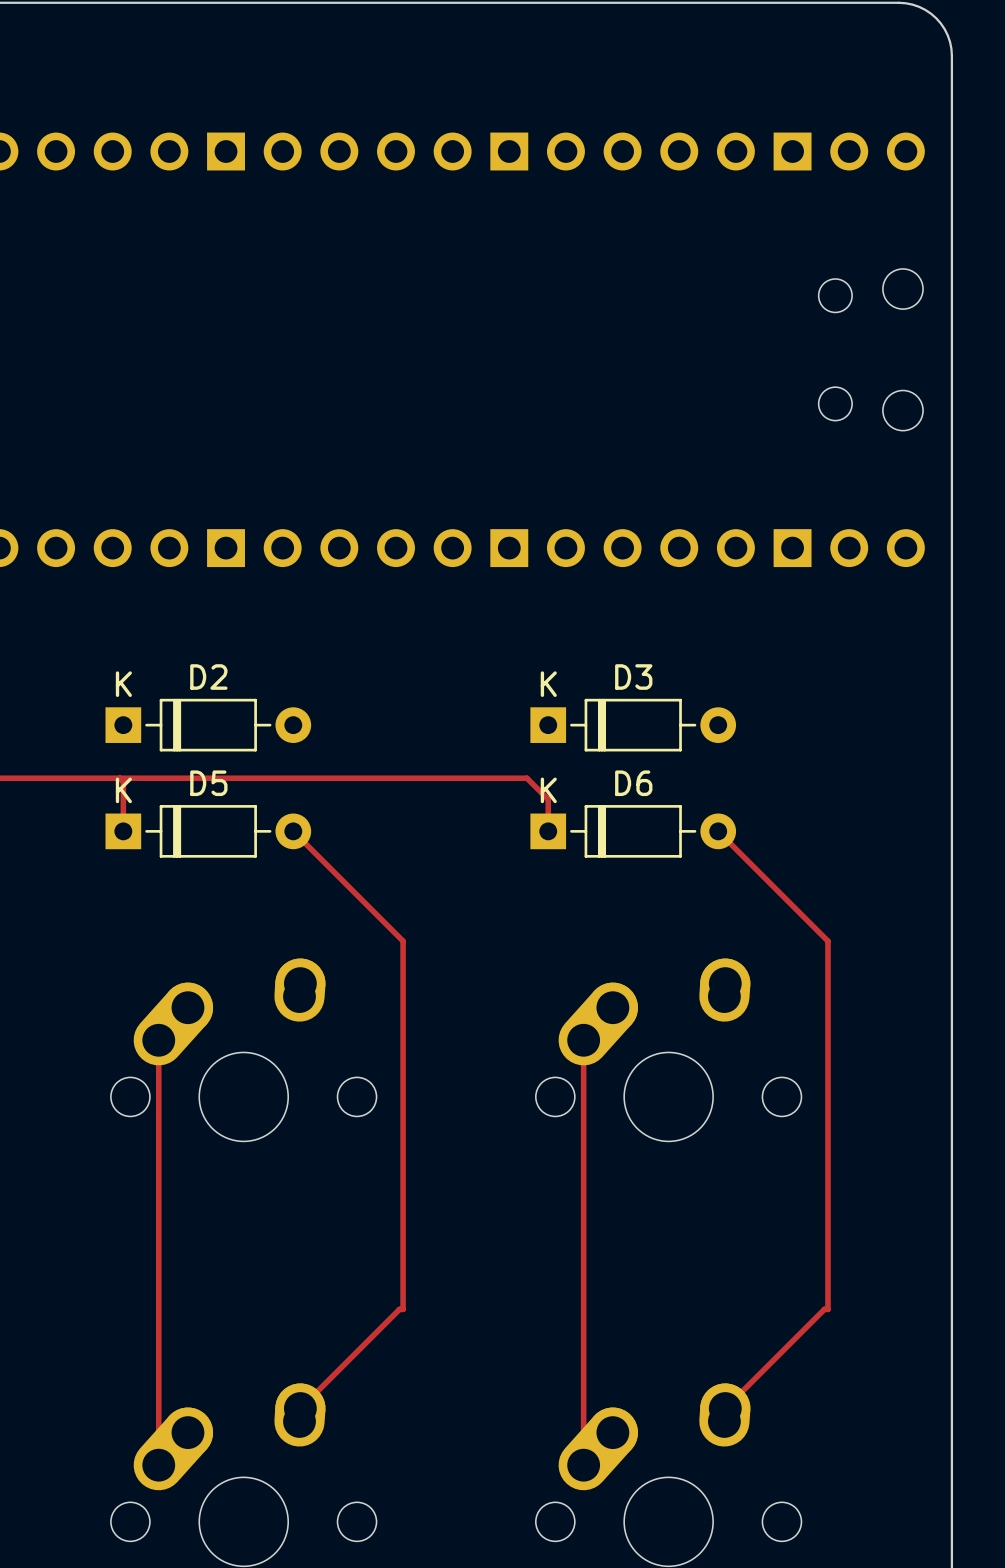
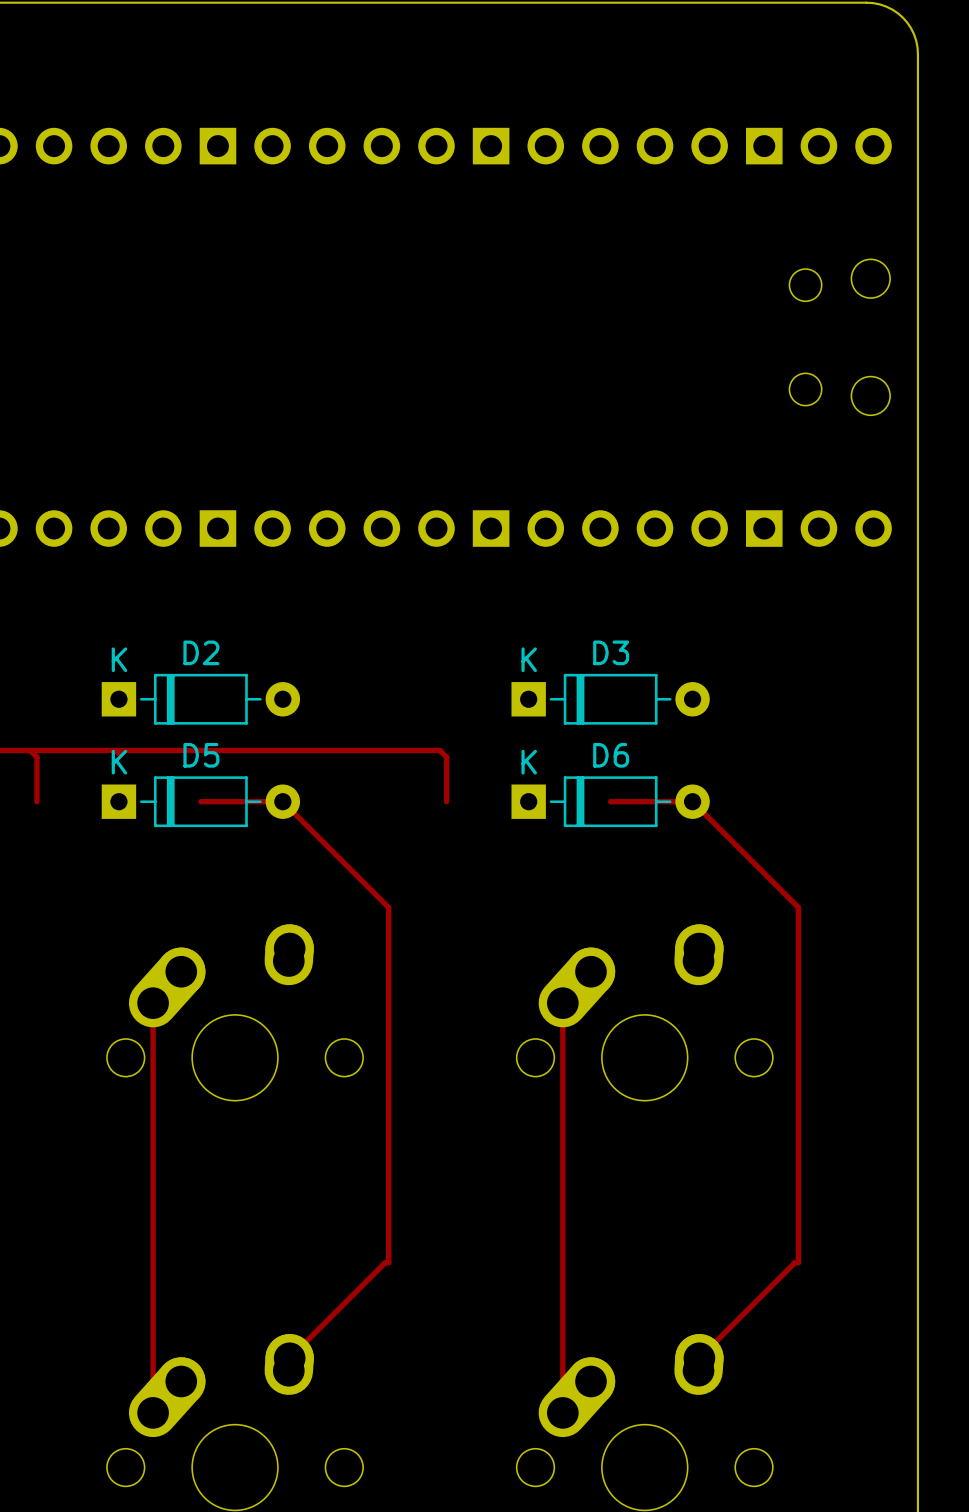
track: none -> (30, 750) (36, 757) (36, 801)
track: (456, 778) (527, 778) (548, 799) (548, 831) -> (439, 750) (446, 757) (446, 801)
track: (123, 781) (123, 831) -> none
track: none -> (200, 801) (282, 801)
track: none -> (610, 801) (692, 801)

